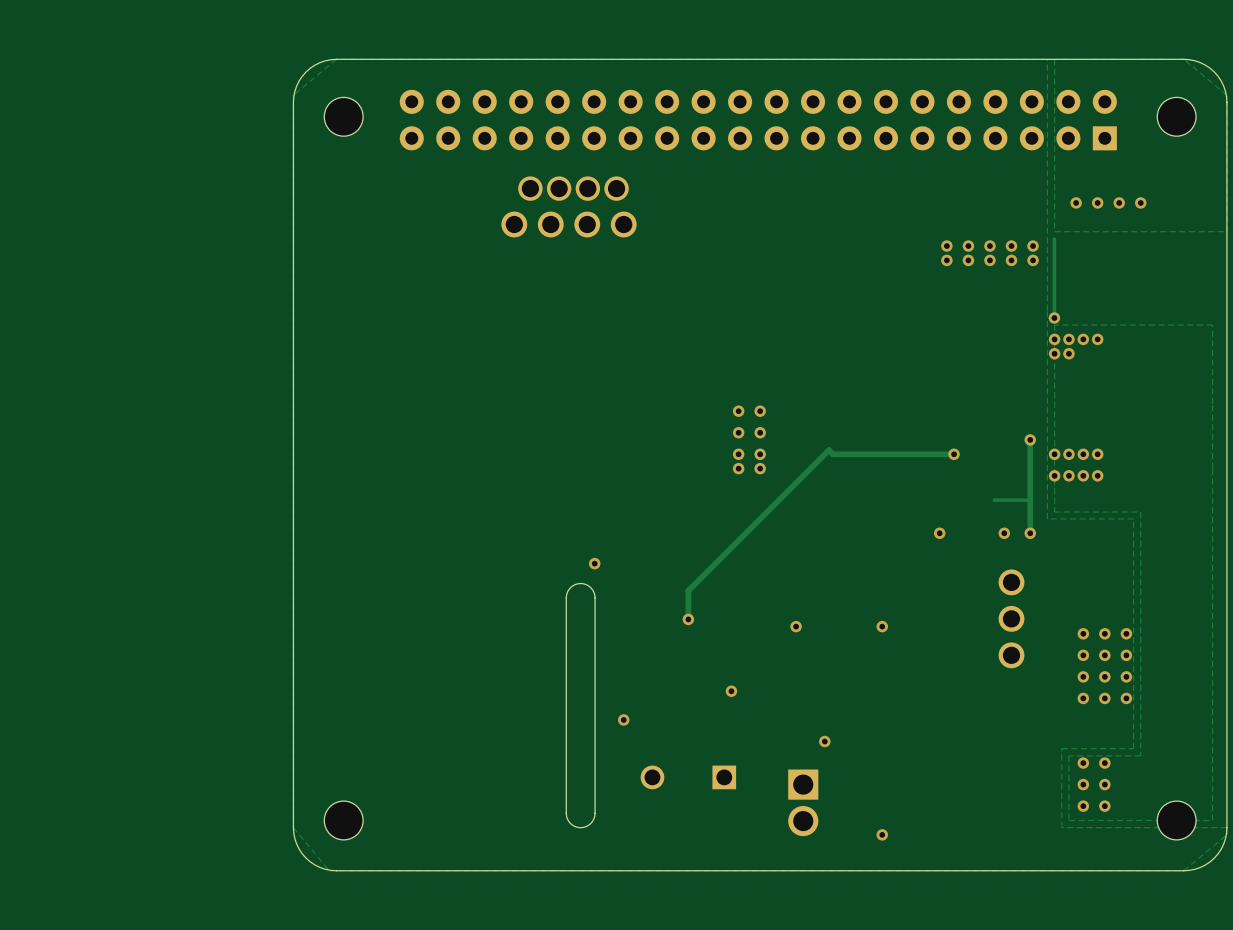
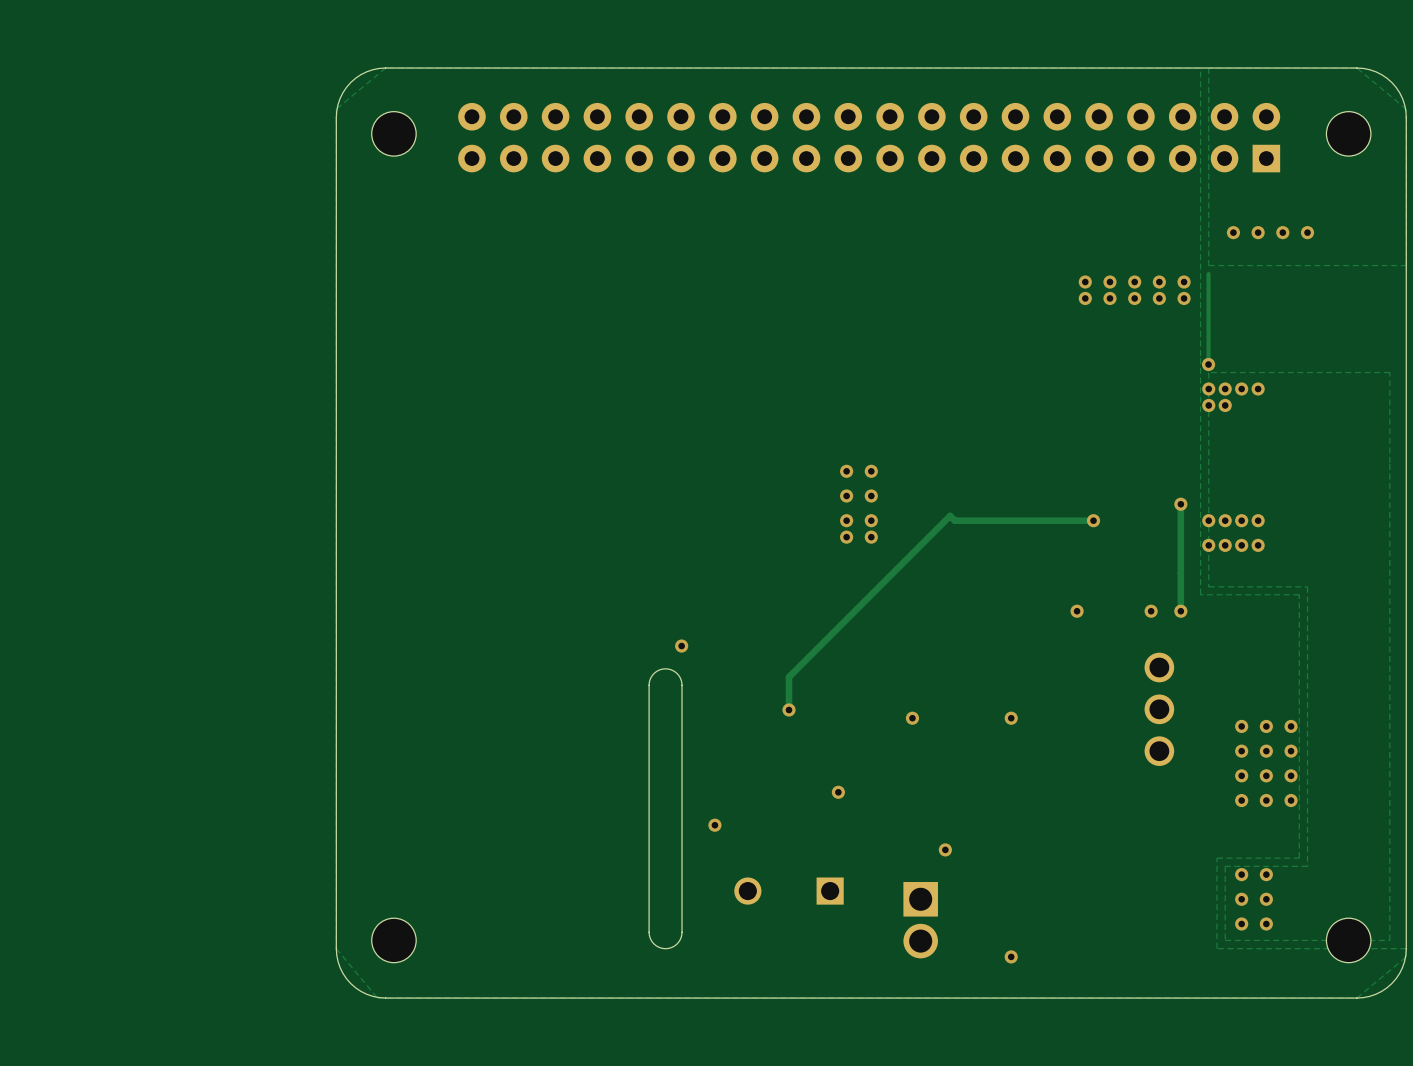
part: (573, 188) -> none
part: (569, 224) -> none
track: (1030, 500) (994, 500) -> none

